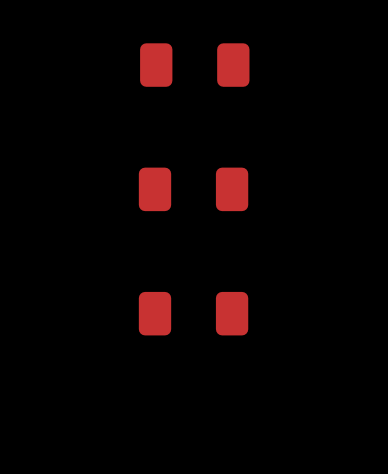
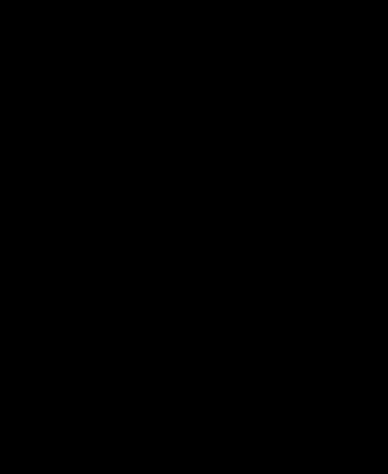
part: (194, 65) -> none
part: (193, 189) -> none
part: (193, 313) -> none

